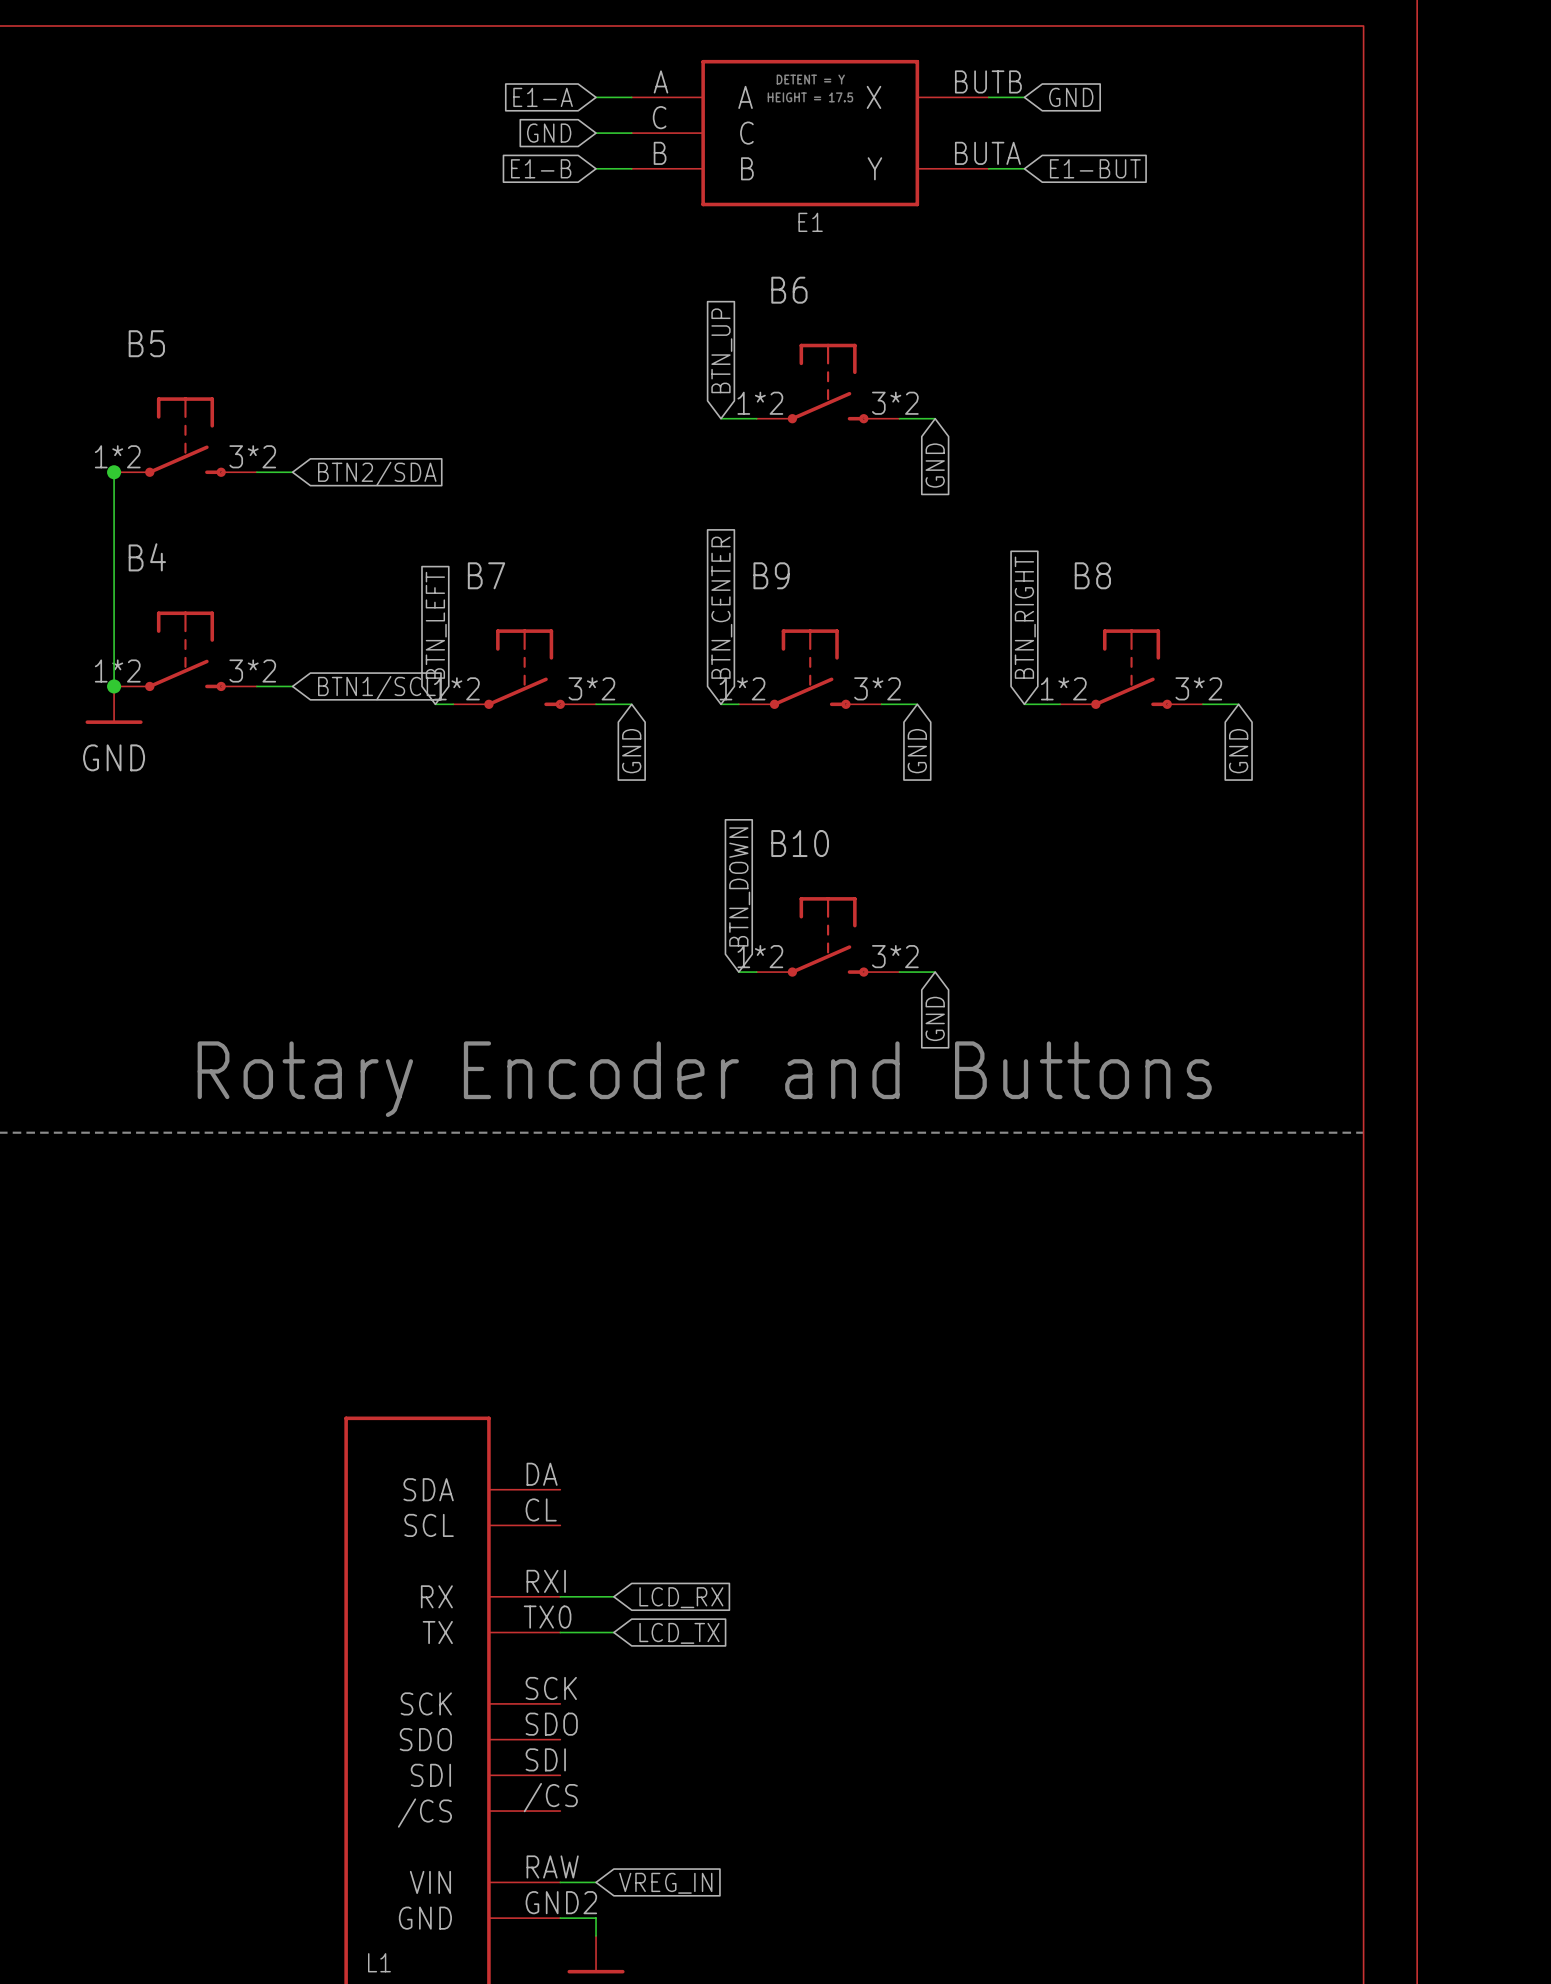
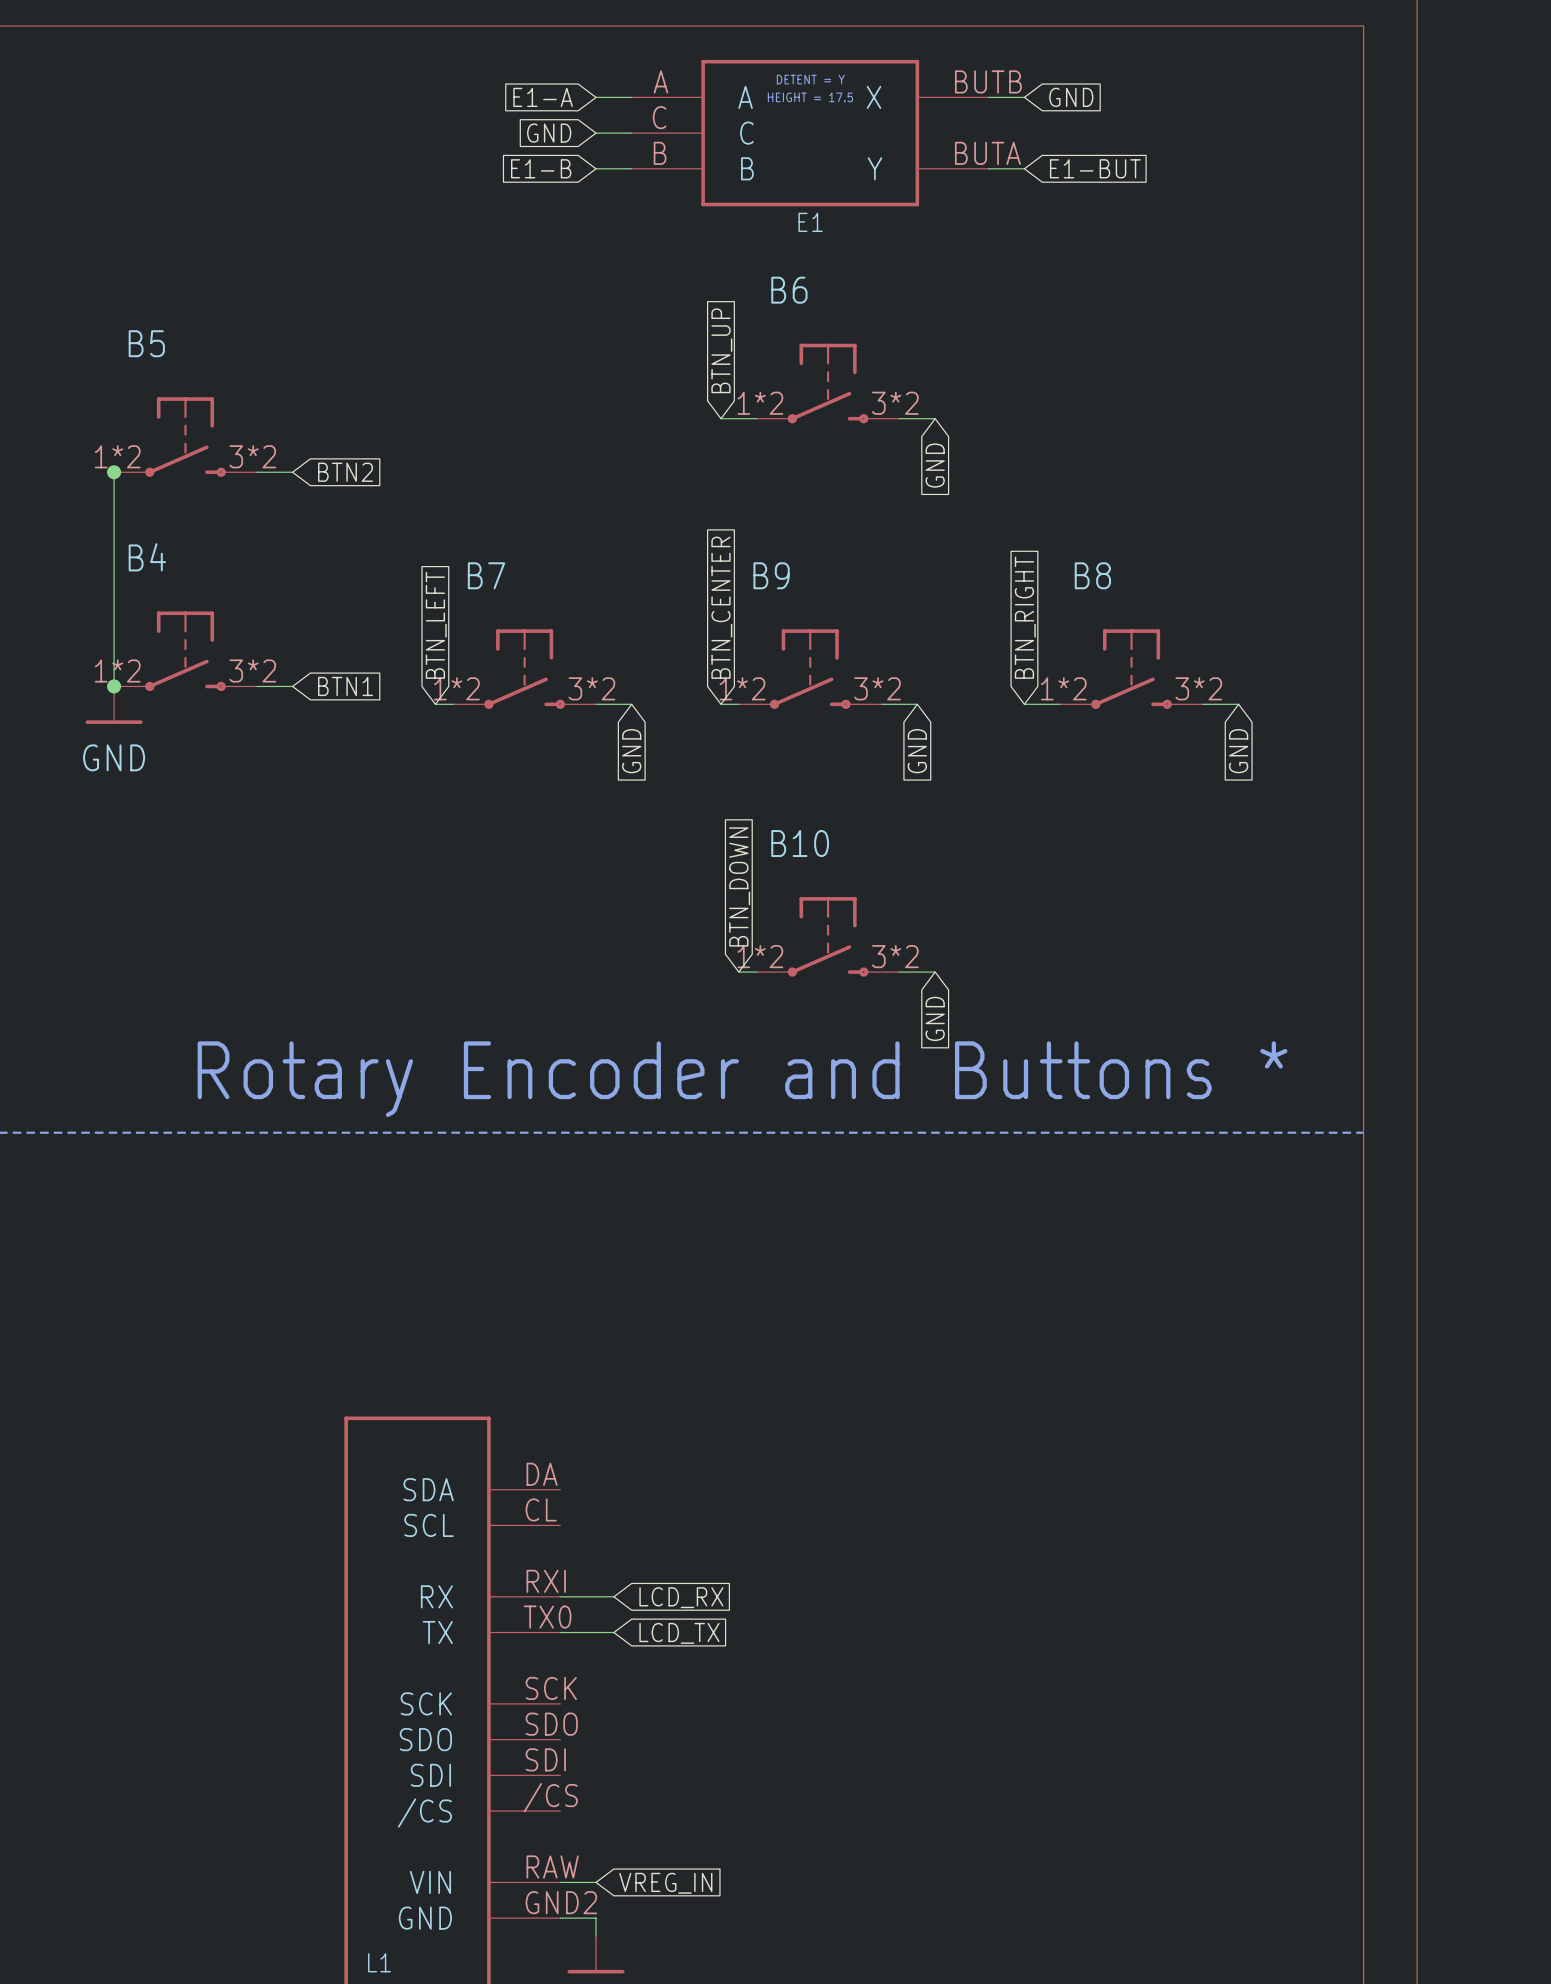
global label: BTN2/SDA (377, 473) -> BTN2 (345, 472)
global label: BTN1/SCL (376, 688) -> BTN1 (345, 686)
text: Rotary Encoder and Buttons (704, 1079) -> Rotary Encoder and Buttons * (742, 1079)

